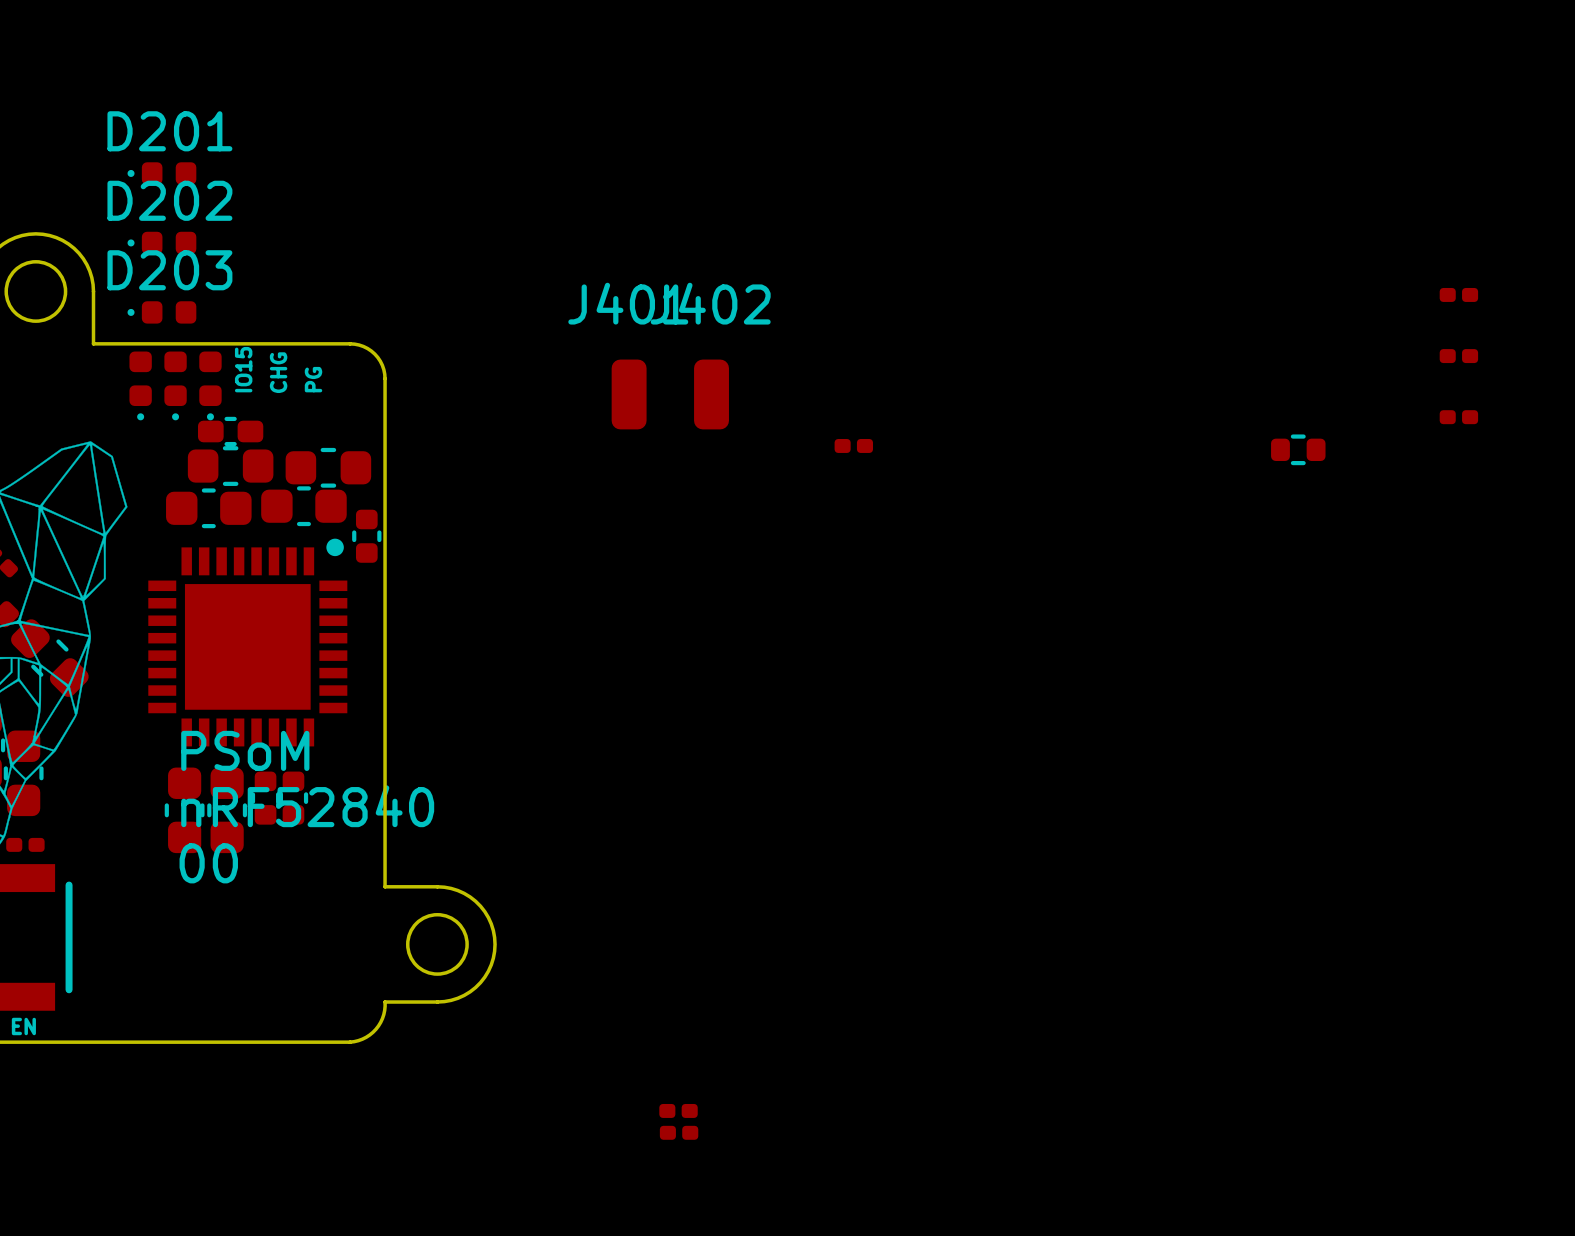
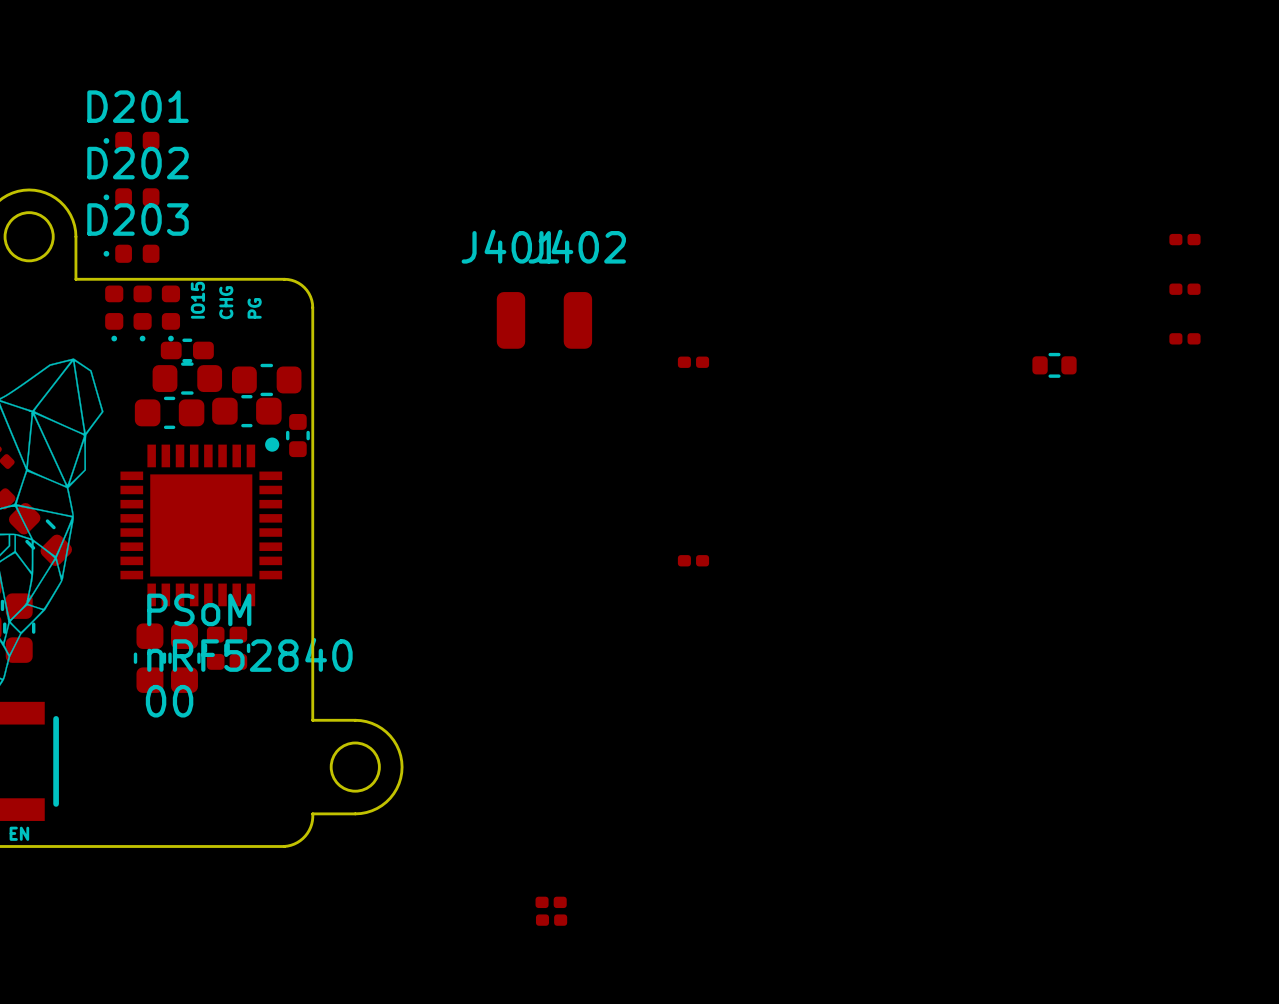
part position: (25, 844) -> (693, 560)

